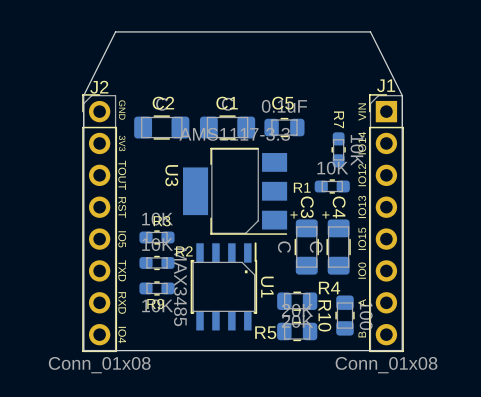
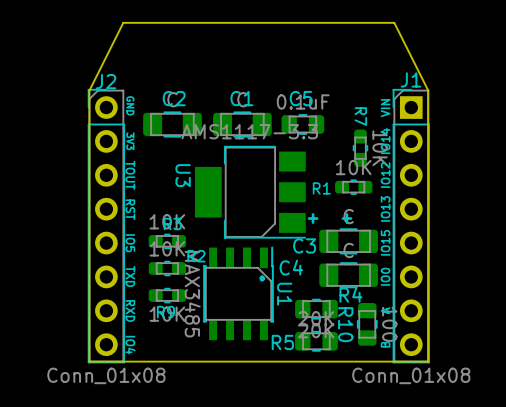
C3 name position: C3 (307, 207) -> C3 (304, 245)
C4 name position: C4 (339, 207) -> C4 (291, 267)
C3 rotation: 0° (306, 247) -> 90° clockwise (348, 241)
C4 rotation: 0° (338, 247) -> 90° clockwise (348, 275)

